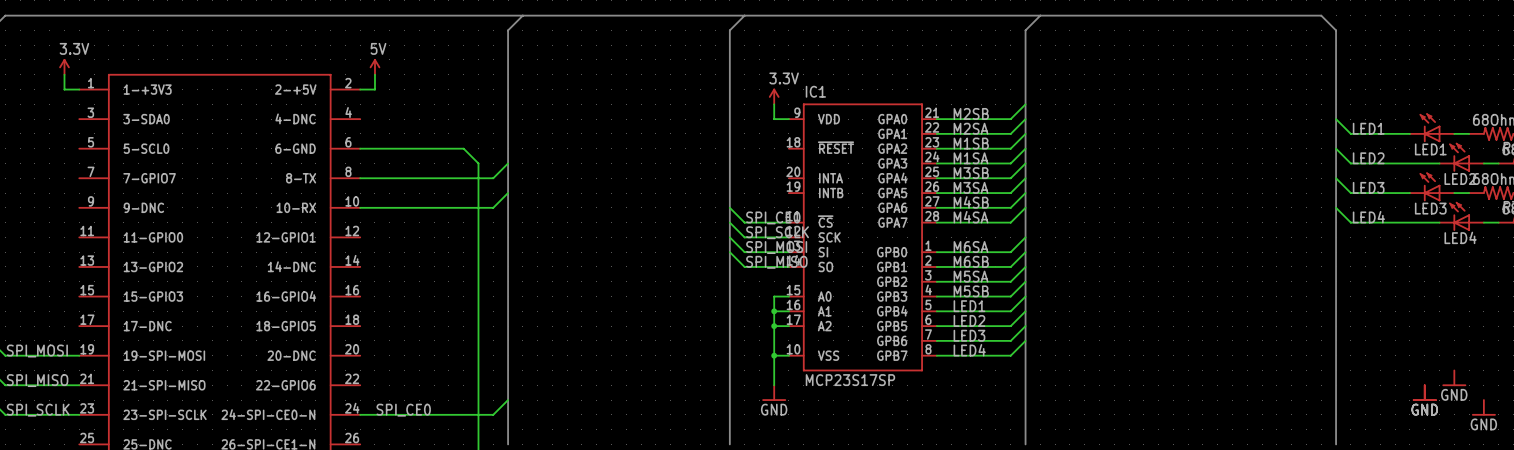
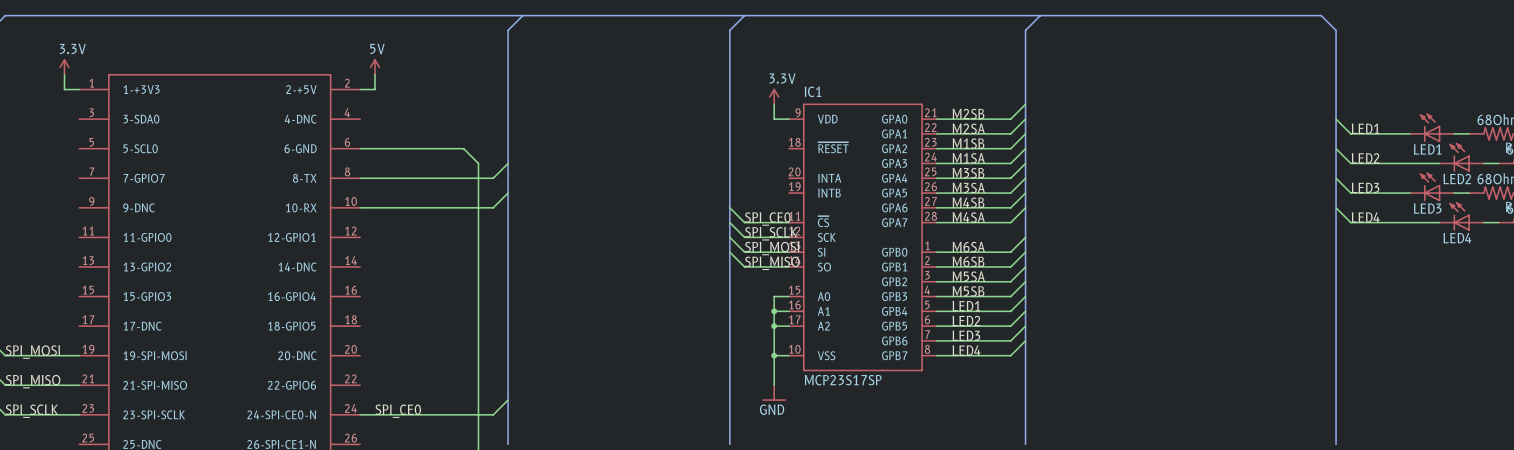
power symbol: GND (1454, 378) -> none
power symbol: GND (1424, 393) -> none
power symbol: GND (1483, 407) -> none

